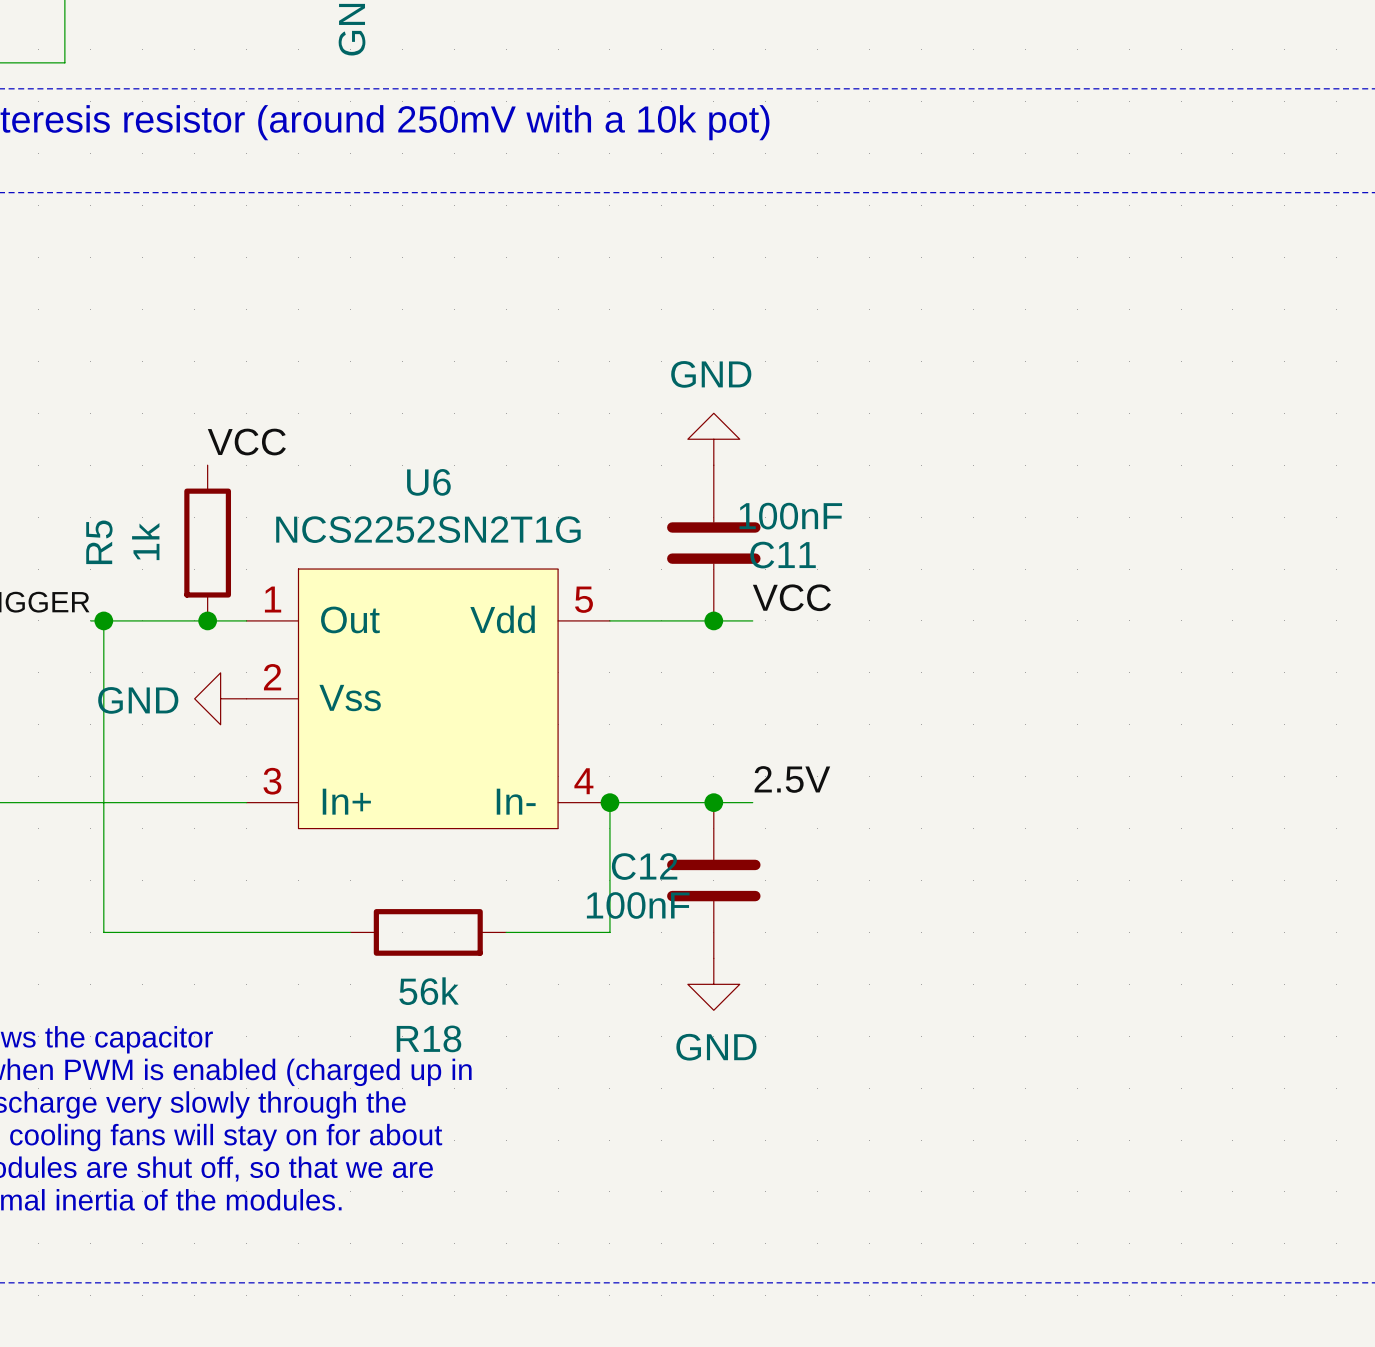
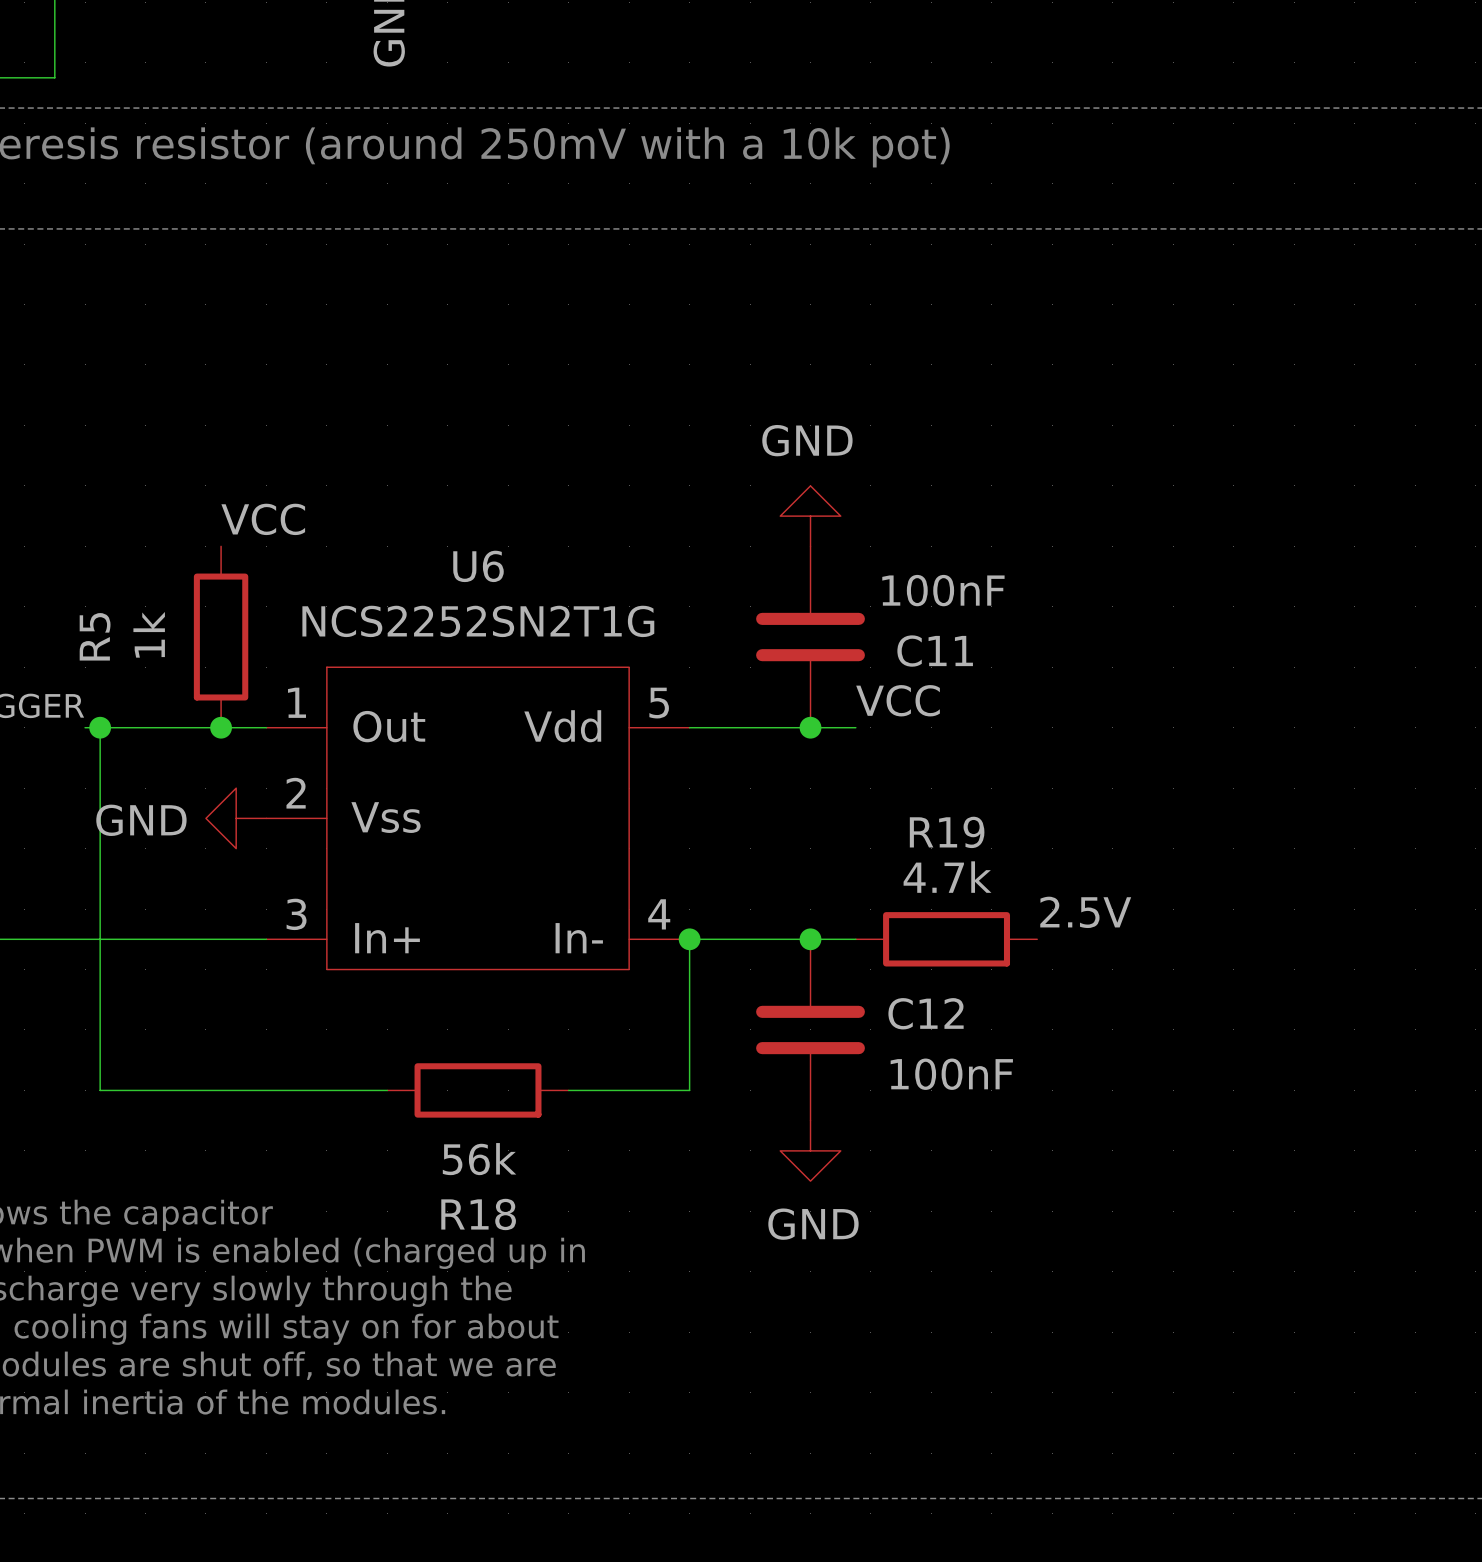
C11 value position: 100nF (790, 516) -> 100nF (943, 590)
C11 name position: C11 (783, 555) -> C11 (935, 651)
label position: 2.5V (792, 779) -> 2.5V (1085, 912)
R19: none -> 4.7k (946, 939)
C12 name position: C12 (644, 866) -> C12 (926, 1013)
C12 value position: 100nF (638, 905) -> 100nF (951, 1074)

